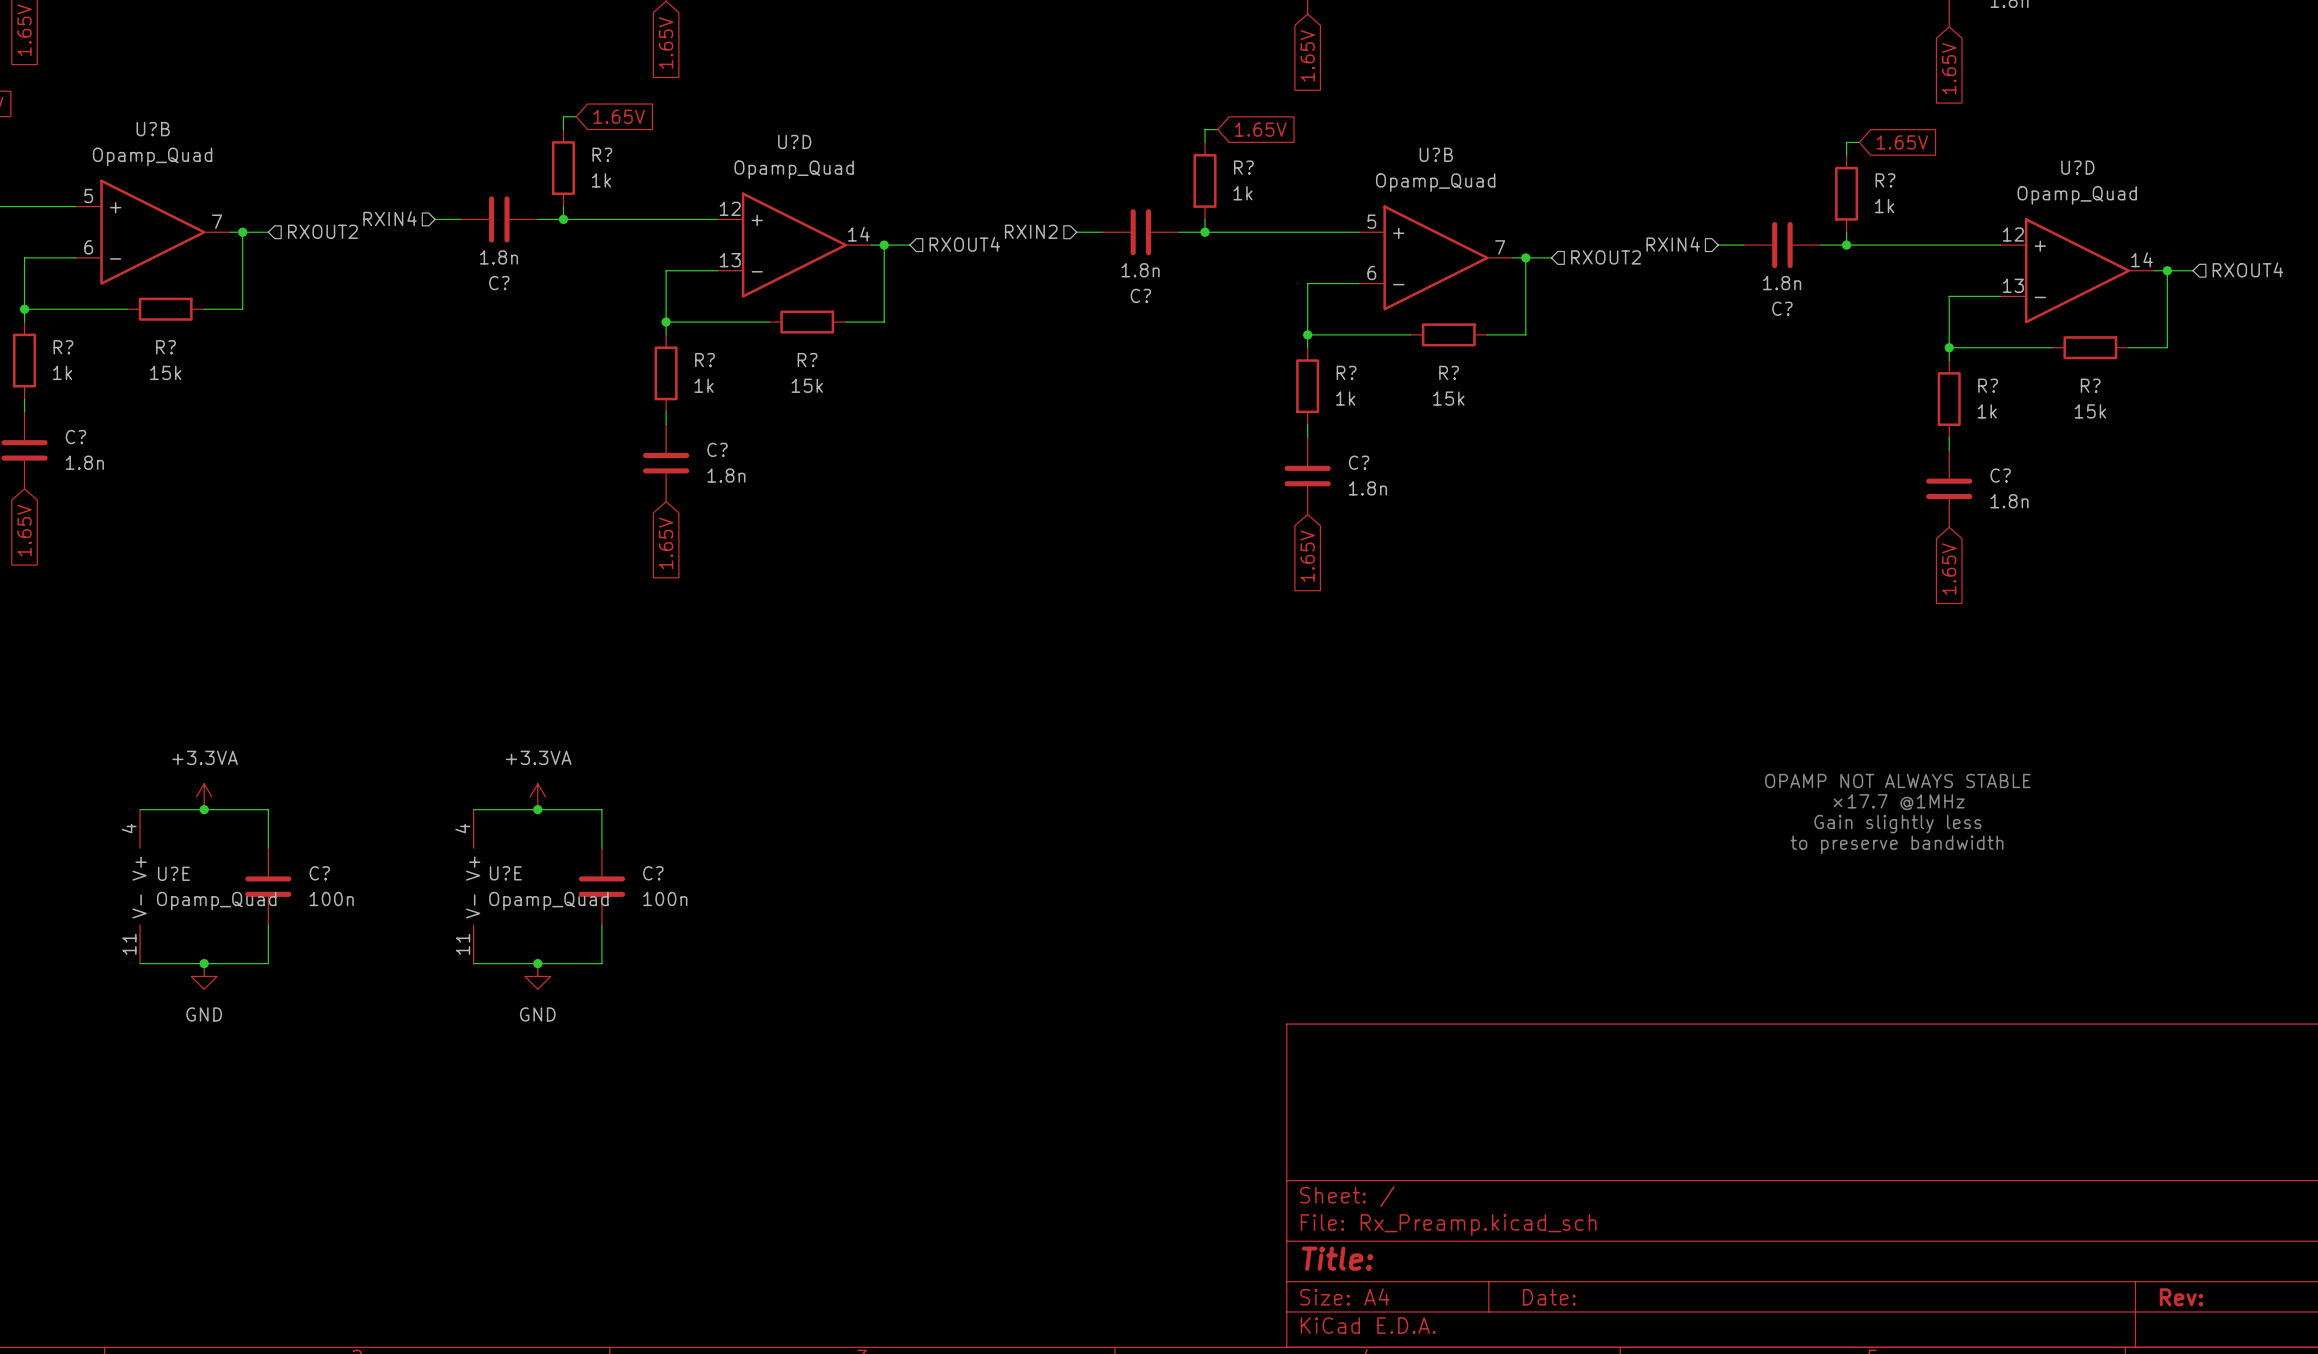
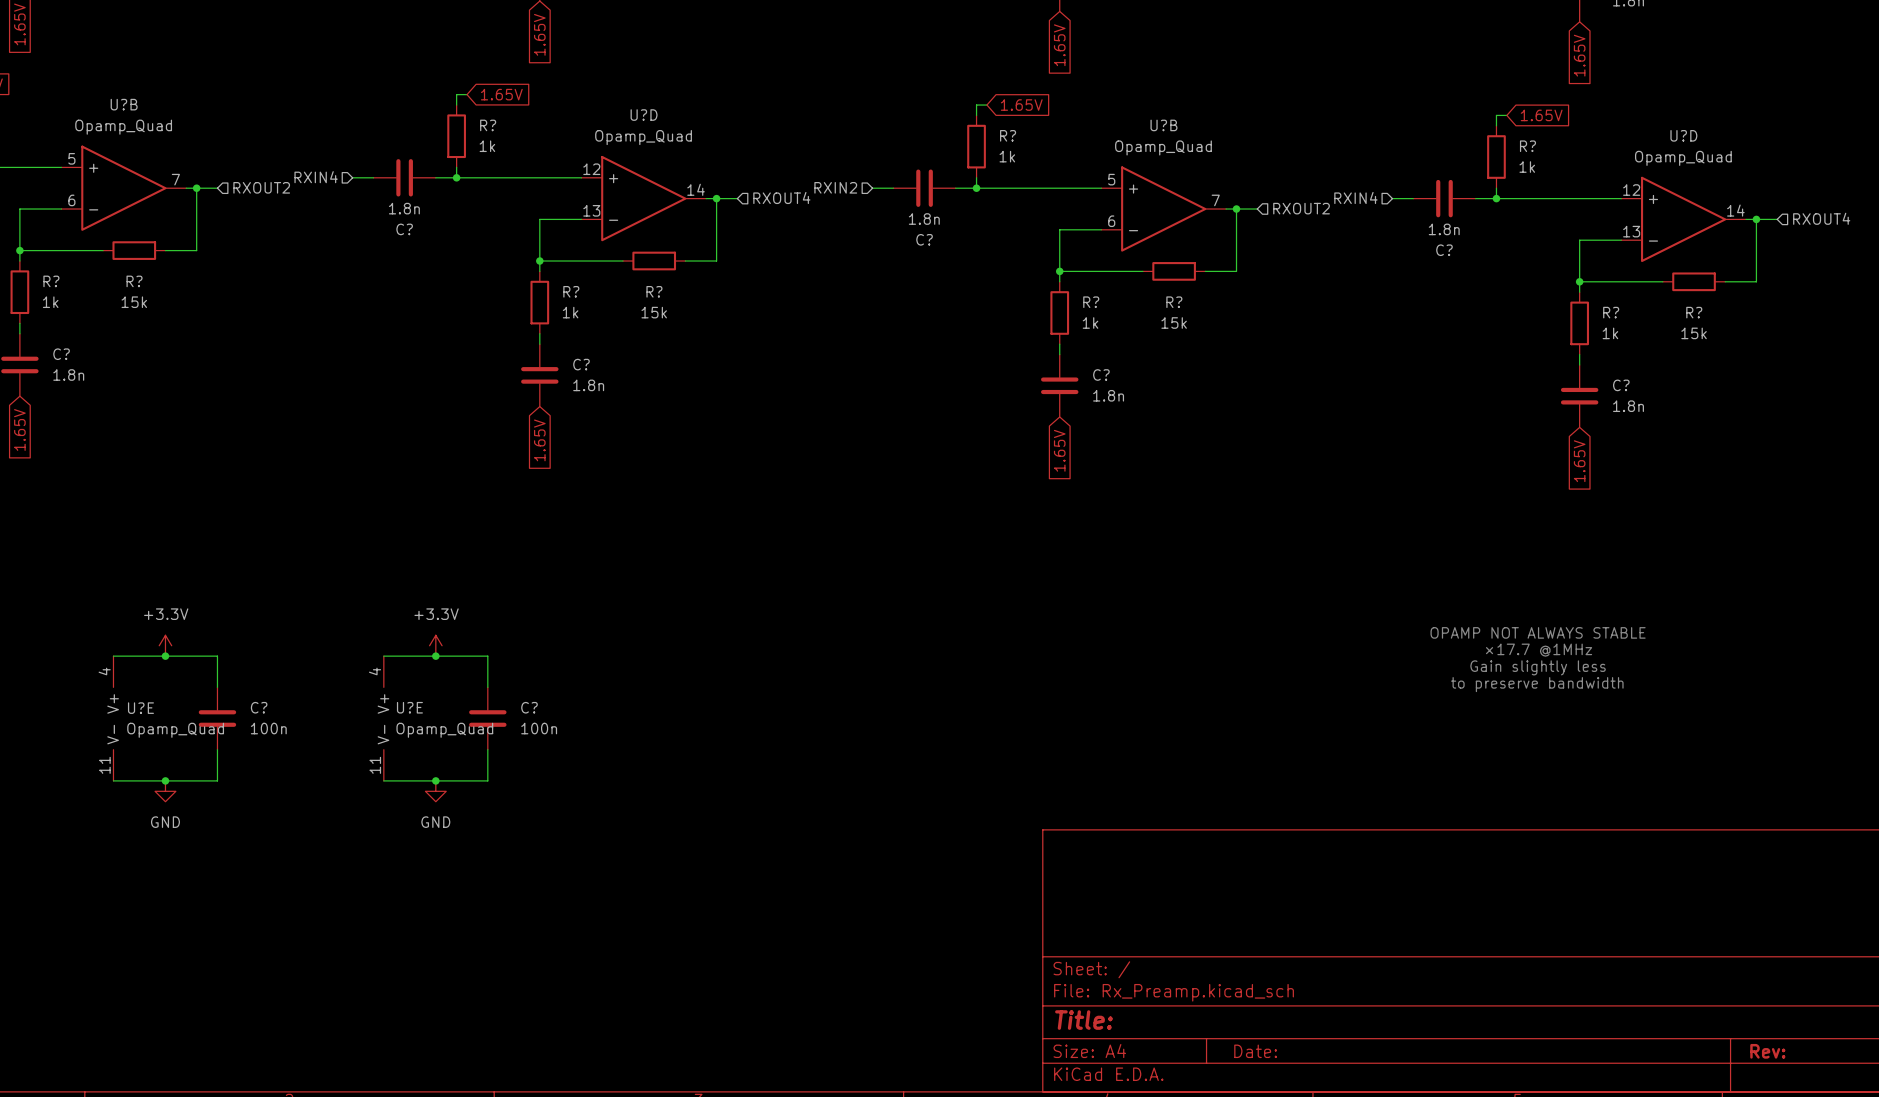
power symbol: +3.3VA (204, 796) -> +3.3V (165, 645)
power symbol: +3.3VA (537, 796) -> +3.3V (435, 645)

